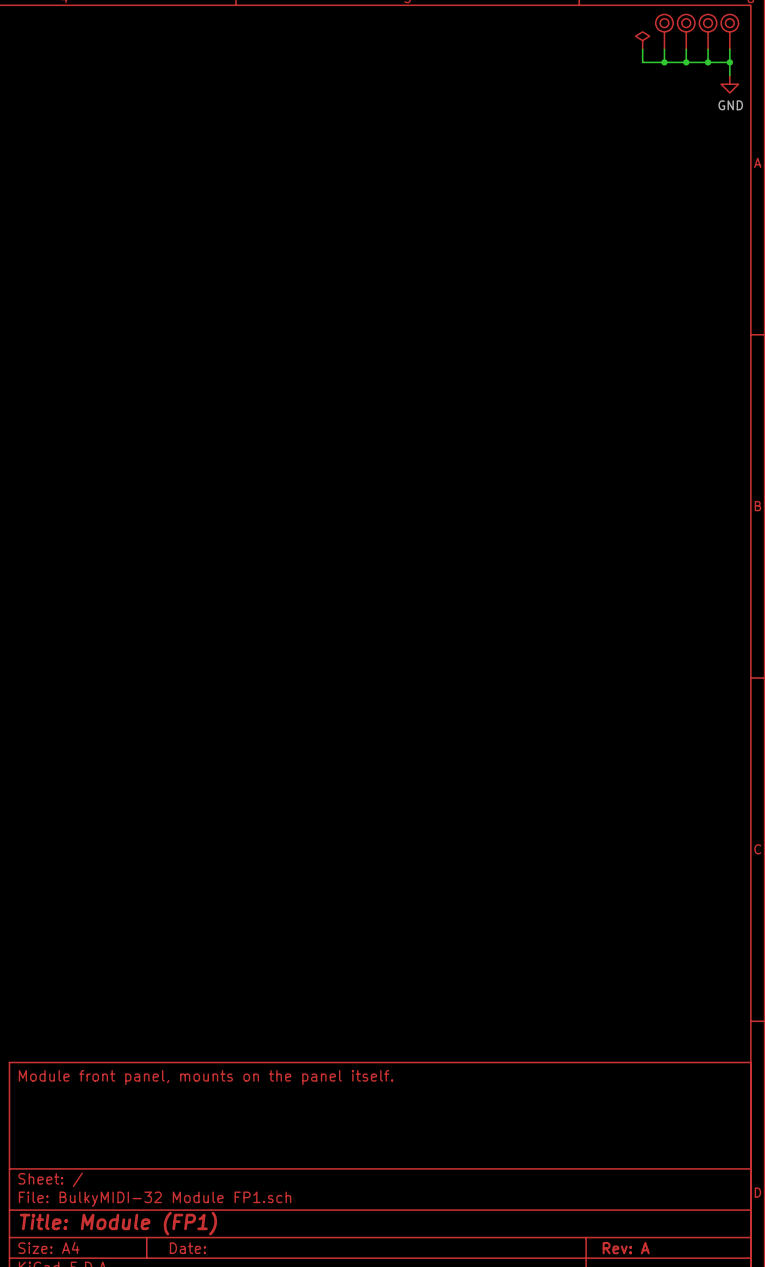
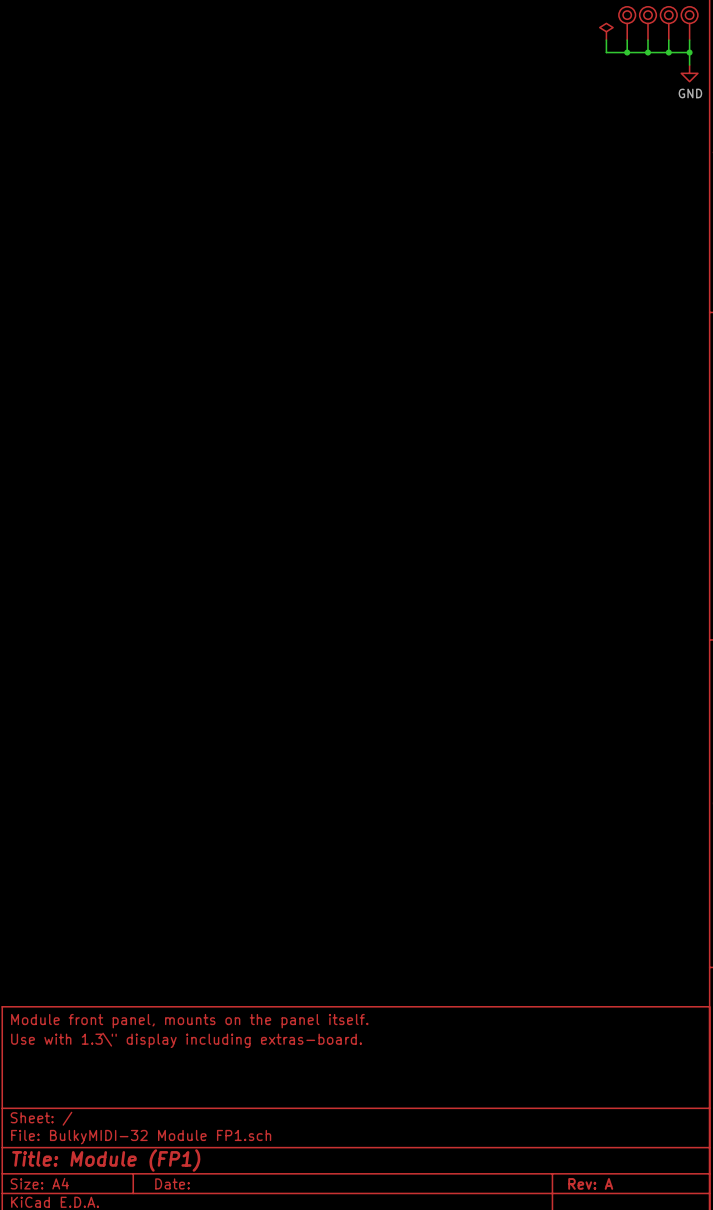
title block: none -> Use with 1.3\" display including extras-board. (186, 1040)

